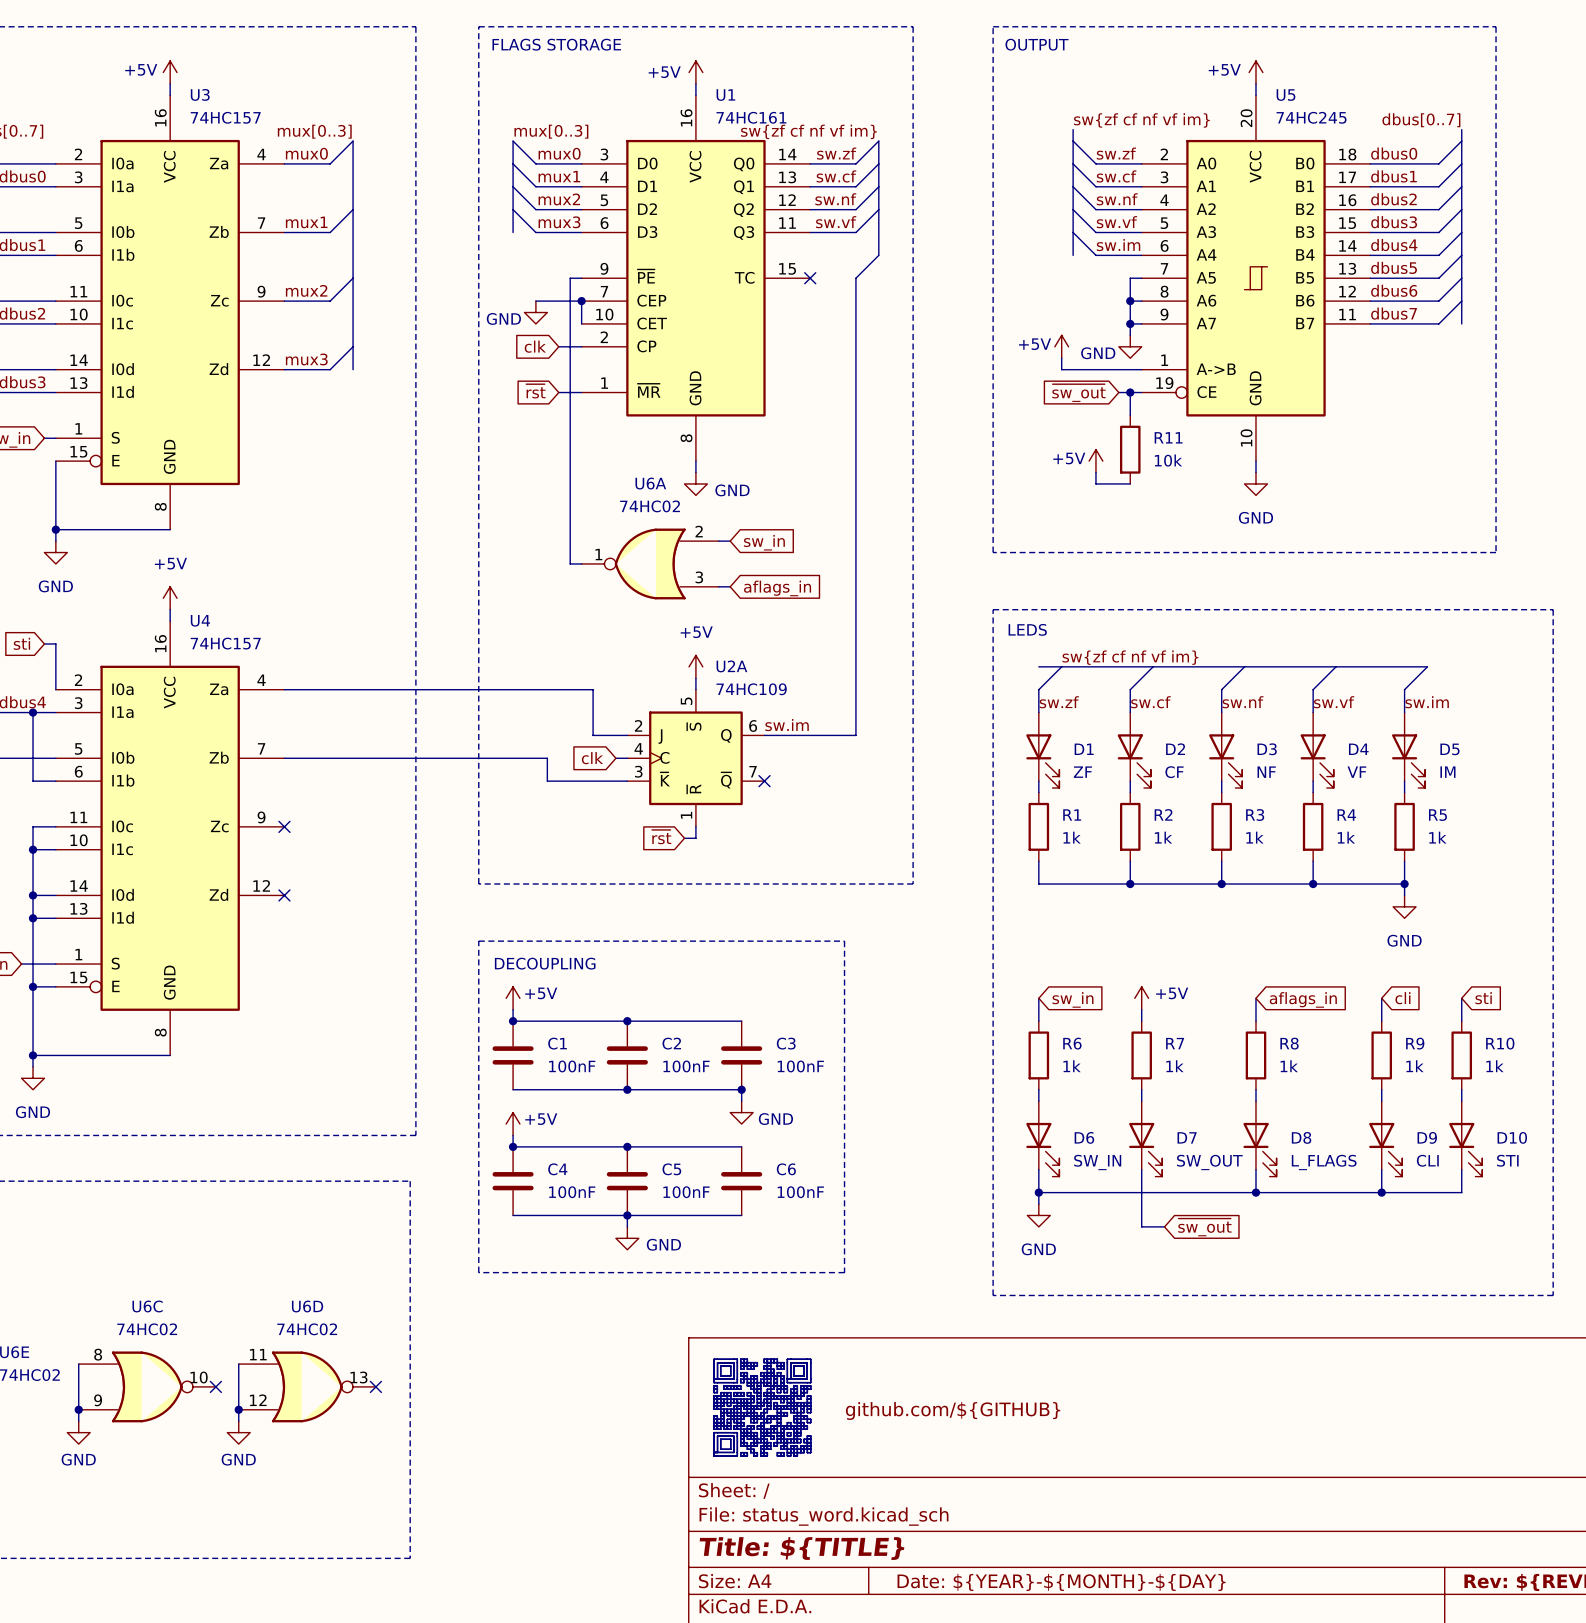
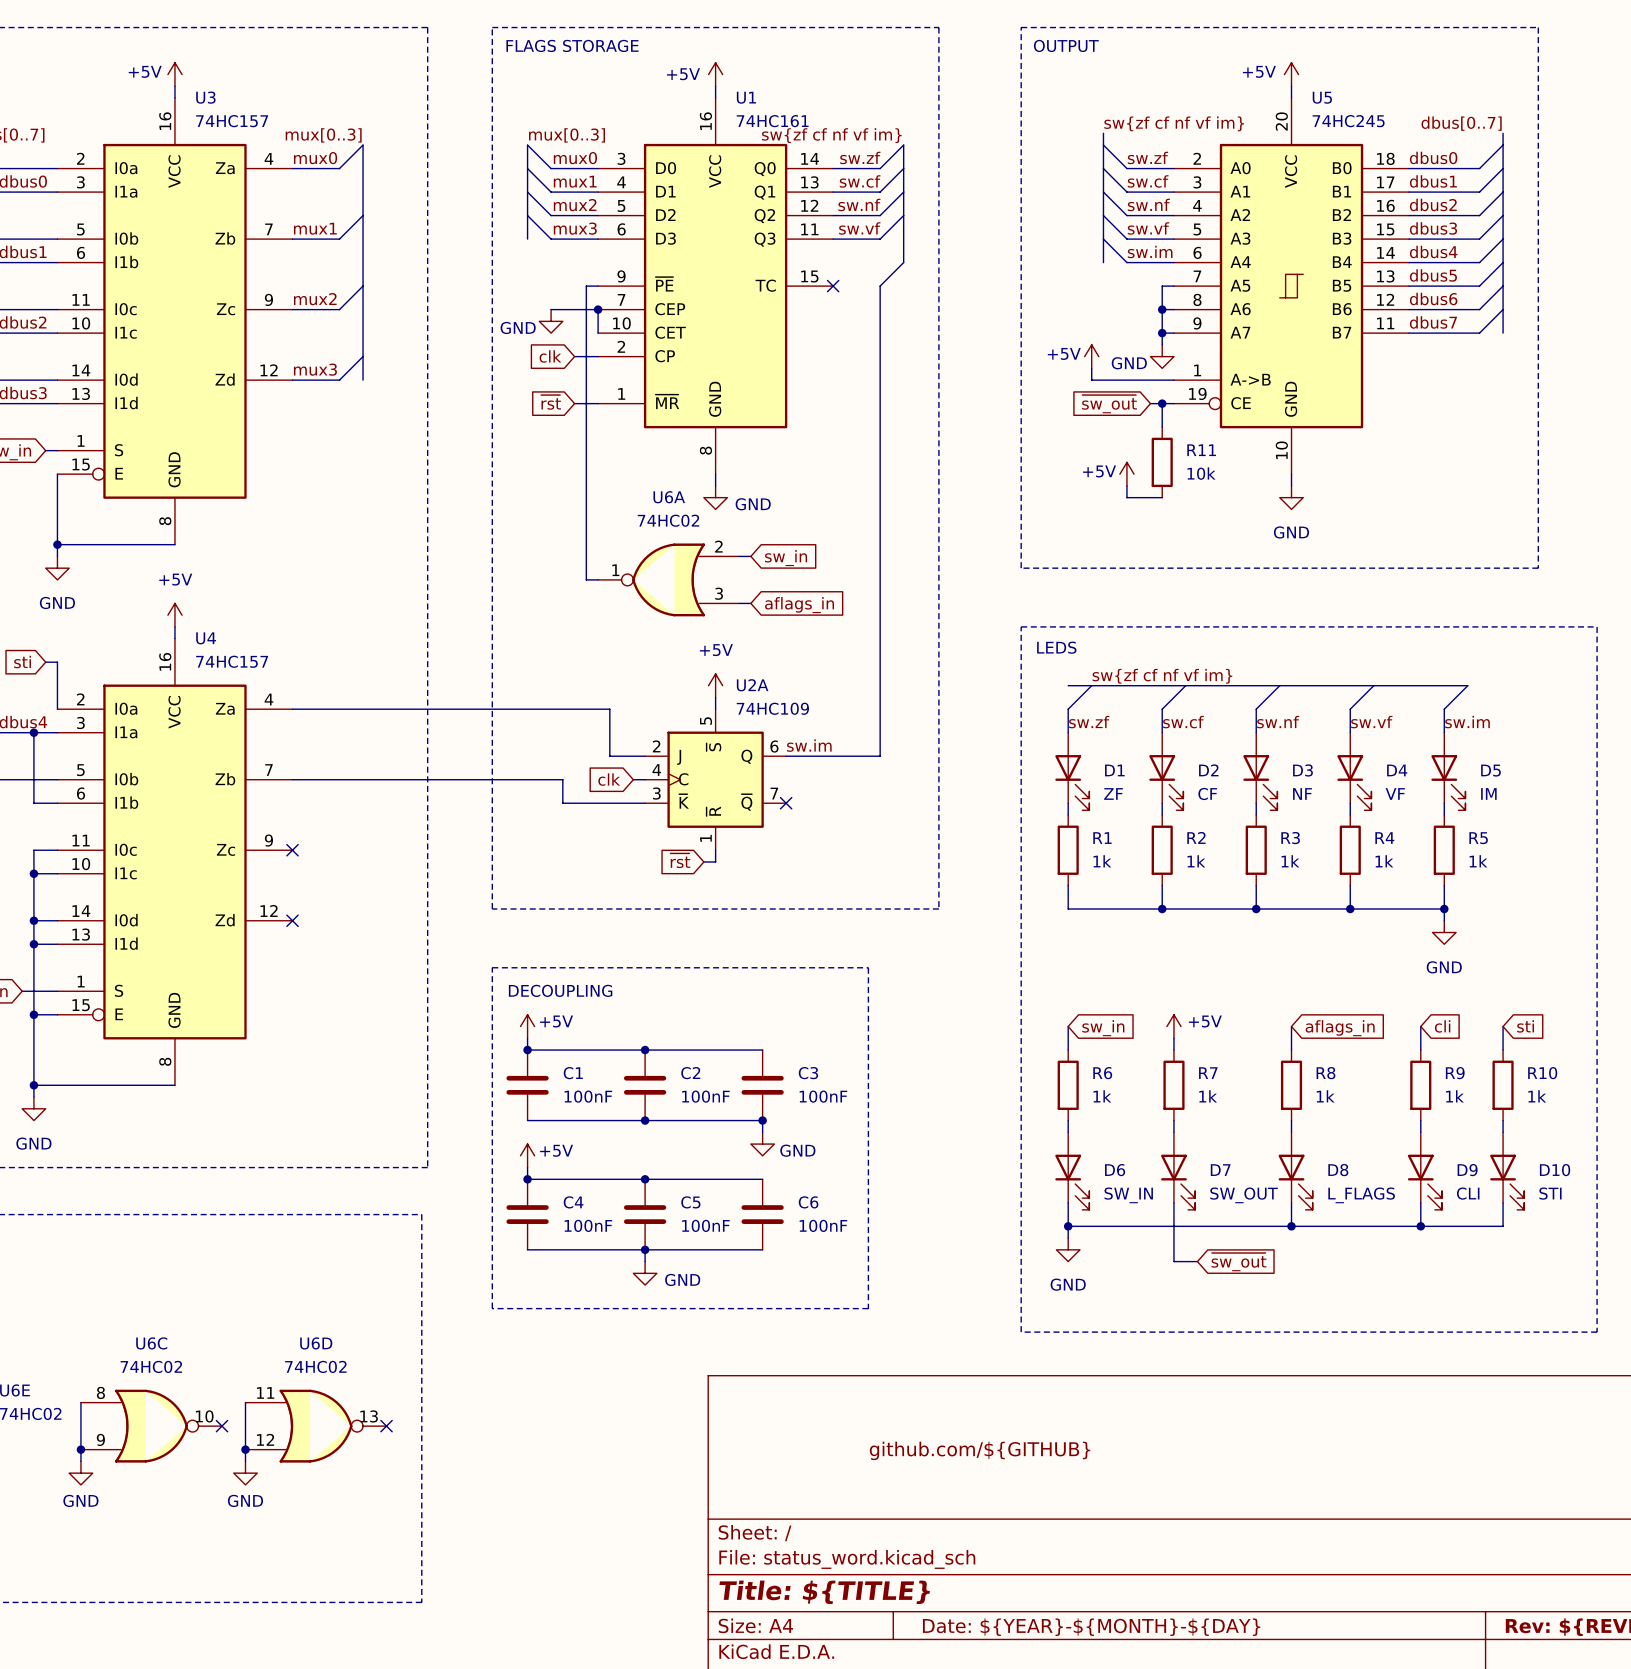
line: (714, 1359) (714, 1382) (737, 1382) (737, 1359) (714, 1359) -> none
line: (744, 1359) (744, 1369) (740, 1369) (740, 1359) (747, 1359) (747, 1369) (754, 1369) (754, 1362) -> none
line: (764, 1359) (764, 1362) (784, 1362) (784, 1369) (777, 1369) (777, 1359) (764, 1359) -> none
line: (767, 1359) (767, 1385) -> none
line: (770, 1359) (770, 1409) (764, 1409) (764, 1455) -> none
line: (787, 1359) (787, 1382) (810, 1382) (810, 1359) (787, 1359) -> none
line: (740, 1362) (757, 1362) (757, 1365) (740, 1365) -> none
line: (750, 1362) (750, 1369) -> none
line: (780, 1362) (780, 1369) -> none
line: (720, 1365) (720, 1375) (730, 1375) (730, 1365) (720, 1365) -> none
line: (770, 1365) (764, 1365) (764, 1369) (774, 1369) (774, 1389) (767, 1389) (767, 1412) (760, 1412) (760, 1419) -> none
line: (777, 1365) (784, 1365) -> none
line: (794, 1365) (794, 1375) (804, 1375) (804, 1365) (794, 1365) -> none
line: (744, 1372) (744, 1382) (740, 1382) (740, 1379) (757, 1379) -> none
line: (764, 1372) (764, 1385) (787, 1385) (787, 1392) (784, 1392) (784, 1375) (760, 1375) (760, 1372) (774, 1372) -> none
line: (777, 1372) (777, 1392) (780, 1392) (780, 1372) (777, 1372) -> none
line: (747, 1375) (740, 1375) (740, 1372) (747, 1372) (747, 1385) (754, 1385) -> none
line: (754, 1375) (754, 1392) (760, 1392) -> none
line: (714, 1379) (733, 1379) (733, 1362) (717, 1362) (717, 1379) -> none
line: (770, 1379) (760, 1379) (760, 1409) (744, 1409) (744, 1399) -> none
line: (787, 1379) (807, 1379) (807, 1362) (790, 1362) (790, 1379) -> none
line: (747, 1382) (770, 1382) -> none
line: (714, 1385) (717, 1385) (717, 1392) (714, 1392) (714, 1385) -> none
line: (724, 1385) (740, 1385) (740, 1389) (724, 1389) (724, 1385) -> none
line: (804, 1385) (804, 1395) (764, 1395) (764, 1392) (774, 1392) (774, 1399) -> none
line: (807, 1385) (807, 1392) (800, 1392) -> none
line: (760, 1389) (750, 1389) (750, 1375) (757, 1375) (757, 1409) -> none
line: (777, 1389) (787, 1389) -> none
line: (797, 1389) (790, 1389) (790, 1412) (804, 1412) (804, 1402) -> none
line: (800, 1389) (810, 1389) (810, 1385) (800, 1385) (800, 1399) (797, 1399) (797, 1385) (794, 1385) (794, 1412) -> none
line: (727, 1392) (727, 1405) (730, 1405) (730, 1392) (720, 1392) (720, 1429) (714, 1429) (714, 1415) (717, 1415) (717, 1429) -> none
line: (734, 1392) (744, 1392) (744, 1395) (734, 1395) (734, 1392) -> none
line: (790, 1392) (797, 1392) -> none
line: (717, 1395) (717, 1409) -> none
line: (730, 1395) (714, 1395) (714, 1409) (740, 1409) -> none
line: (780, 1395) (780, 1402) (784, 1402) (784, 1395) -> none
line: (787, 1395) (787, 1409) -> none
line: (807, 1395) (807, 1412) (810, 1412) (810, 1395) (807, 1395) -> none
line: (714, 1399) (754, 1399) -> none
line: (724, 1399) (724, 1405) (714, 1405) -> none
line: (737, 1399) (737, 1429) -> none
line: (740, 1399) (740, 1445) (757, 1445) (757, 1432) (740, 1432) -> none
line: (747, 1399) (747, 1415) -> none
line: (794, 1399) (764, 1399) (764, 1405) (734, 1405) (734, 1422) (744, 1422) (744, 1425) (734, 1425) (734, 1429) (754, 1429) (754, 1425) (747, 1425) (747, 1439) (767, 1439) (767, 1449) -> none
line: (714, 1402) (754, 1402) (754, 1395) (747, 1395) (747, 1392) (750, 1392) (750, 1422) (757, 1422) (757, 1412) (720, 1412) -> none
line: (757, 1402) (770, 1402) -> none
line: (787, 1402) (810, 1402) -> none
line: (797, 1402) (797, 1442) -> none
line: (800, 1402) (800, 1435) (794, 1435) -> none
line: (754, 1405) (754, 1422) -> none
line: (774, 1405) (810, 1405) -> none
line: (780, 1405) (780, 1442) -> none
line: (724, 1409) (724, 1429) (730, 1429) (730, 1409) -> none
line: (727, 1409) (727, 1415) (764, 1415) -> none
line: (797, 1409) (774, 1409) (774, 1402) (777, 1402) (777, 1445) (774, 1445) (774, 1442) (800, 1442) (800, 1439) (777, 1439) -> none
line: (744, 1412) (744, 1419) (727, 1419) (727, 1429) -> none
line: (777, 1412) (787, 1412) (787, 1415) (767, 1415) (767, 1422) -> none
line: (770, 1415) (770, 1422) (760, 1422) (760, 1442) -> none
line: (714, 1419) (724, 1419) -> none
line: (750, 1419) (780, 1419) -> none
line: (794, 1419) (810, 1419) (810, 1422) (807, 1422) (807, 1415) (794, 1415) (794, 1422) (804, 1422) (804, 1429) -> none
line: (714, 1422) (724, 1422) -> none
line: (714, 1425) (730, 1425) -> none
line: (750, 1425) (750, 1439) -> none
line: (764, 1425) (757, 1425) (757, 1429) (777, 1429) -> none
line: (774, 1425) (774, 1432) -> none
line: (784, 1425) (784, 1449) -> none
line: (794, 1425) (794, 1442) -> none
line: (744, 1429) (744, 1445) -> none
line: (767, 1429) (767, 1435) -> none
line: (780, 1429) (807, 1429) (807, 1425) (770, 1425) (770, 1439) (774, 1439) (774, 1435) (760, 1435) -> none
line: (787, 1429) (787, 1422) (790, 1422) (790, 1429) -> none
line: (714, 1432) (714, 1455) (737, 1455) (737, 1432) (714, 1432) -> none
line: (754, 1432) (754, 1445) -> none
line: (760, 1432) (784, 1432) -> none
line: (787, 1432) (787, 1435) (790, 1435) (790, 1432) (787, 1432) -> none
line: (794, 1432) (800, 1432) -> none
line: (740, 1435) (757, 1435) -> none
line: (777, 1435) (784, 1435) -> none
line: (807, 1435) (807, 1452) (810, 1452) (810, 1435) (807, 1435) -> none
line: (720, 1439) (730, 1439) (730, 1449) (720, 1449) (720, 1439) -> none
line: (787, 1439) (787, 1455) (790, 1455) (790, 1445) (797, 1445) (797, 1455) (794, 1455) (794, 1445) -> none
line: (810, 1439) (804, 1439) (804, 1442) (810, 1442) -> none
line: (740, 1442) (747, 1442) (747, 1449) (754, 1449) (754, 1455) (757, 1455) (757, 1452) (750, 1452) (750, 1442) (770, 1442) (770, 1449) (760, 1449) -> none
line: (770, 1445) (760, 1445) (760, 1455) (767, 1455) (767, 1452) (760, 1452) -> none
line: (787, 1445) (780, 1445) (780, 1449) (810, 1449) -> none
line: (804, 1445) (804, 1452) (787, 1452) -> none
line: (810, 1445) (800, 1445) (800, 1452) -> none
line: (714, 1452) (733, 1452) (733, 1436) (717, 1436) (717, 1452) -> none
line: (740, 1452) (747, 1452) (747, 1455) (740, 1455) (740, 1452) -> none
line: (777, 1452) (784, 1452) (784, 1455) (777, 1455) (777, 1452) -> none

